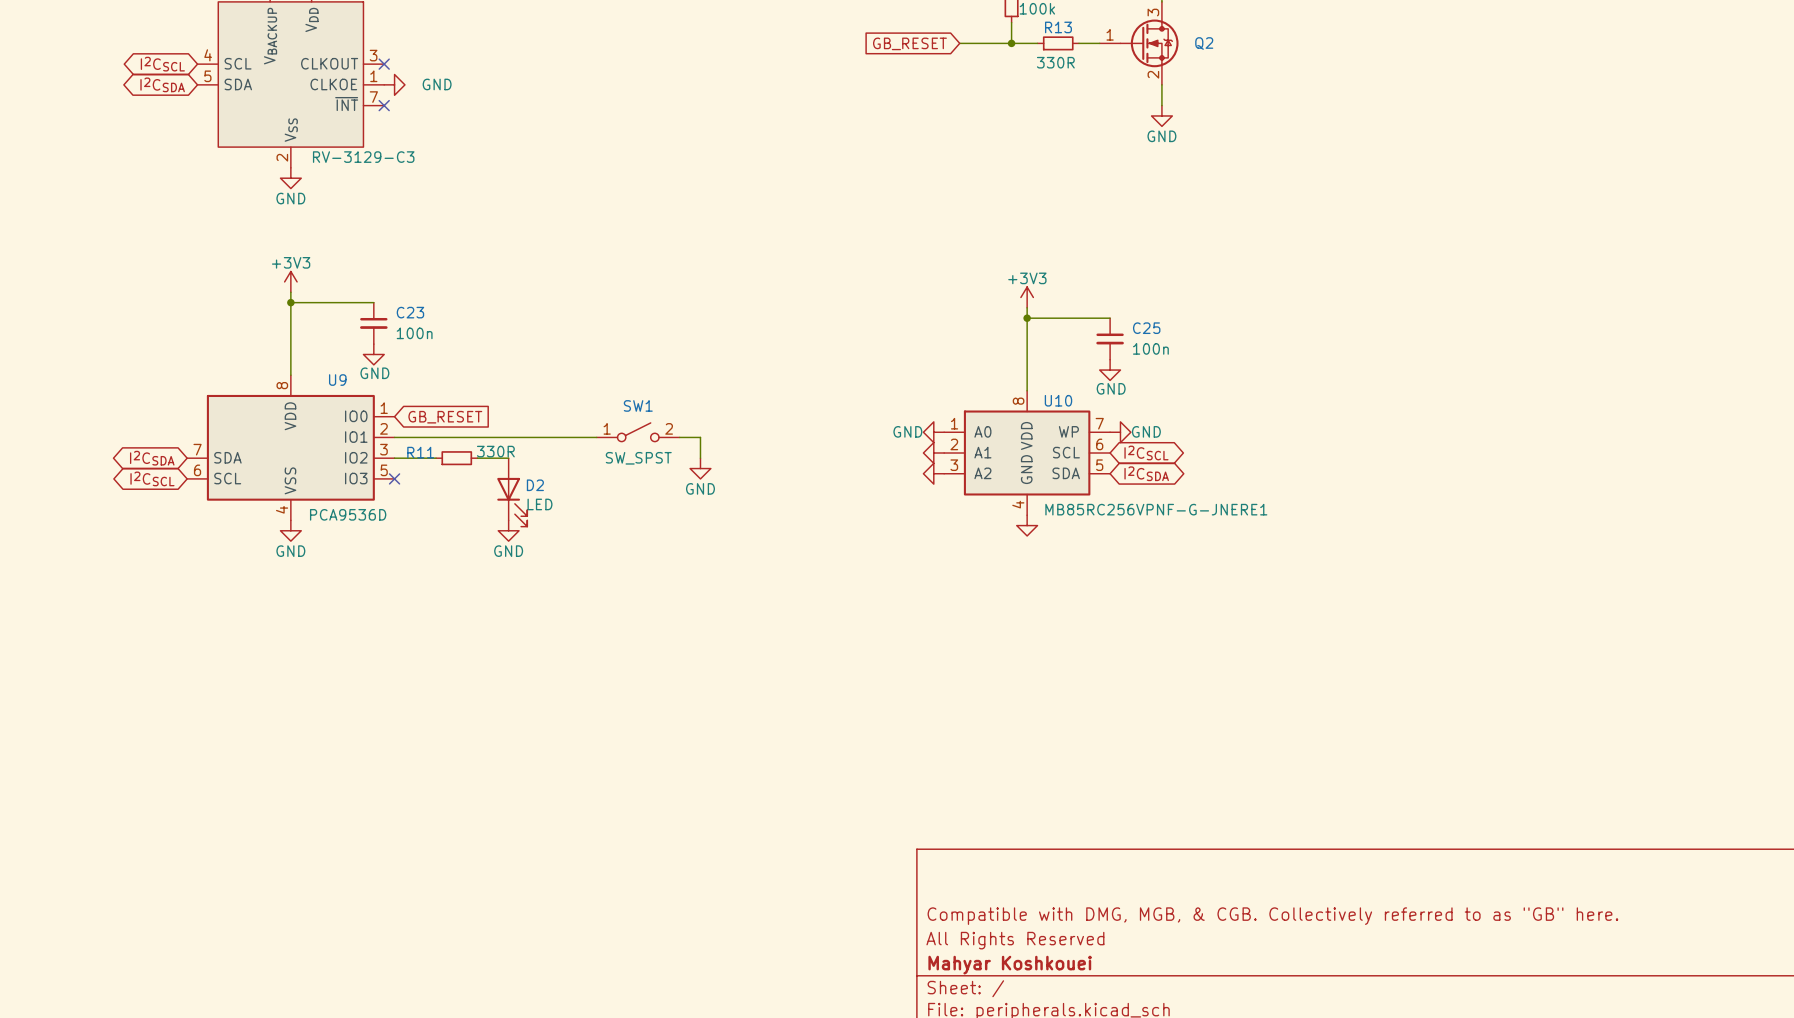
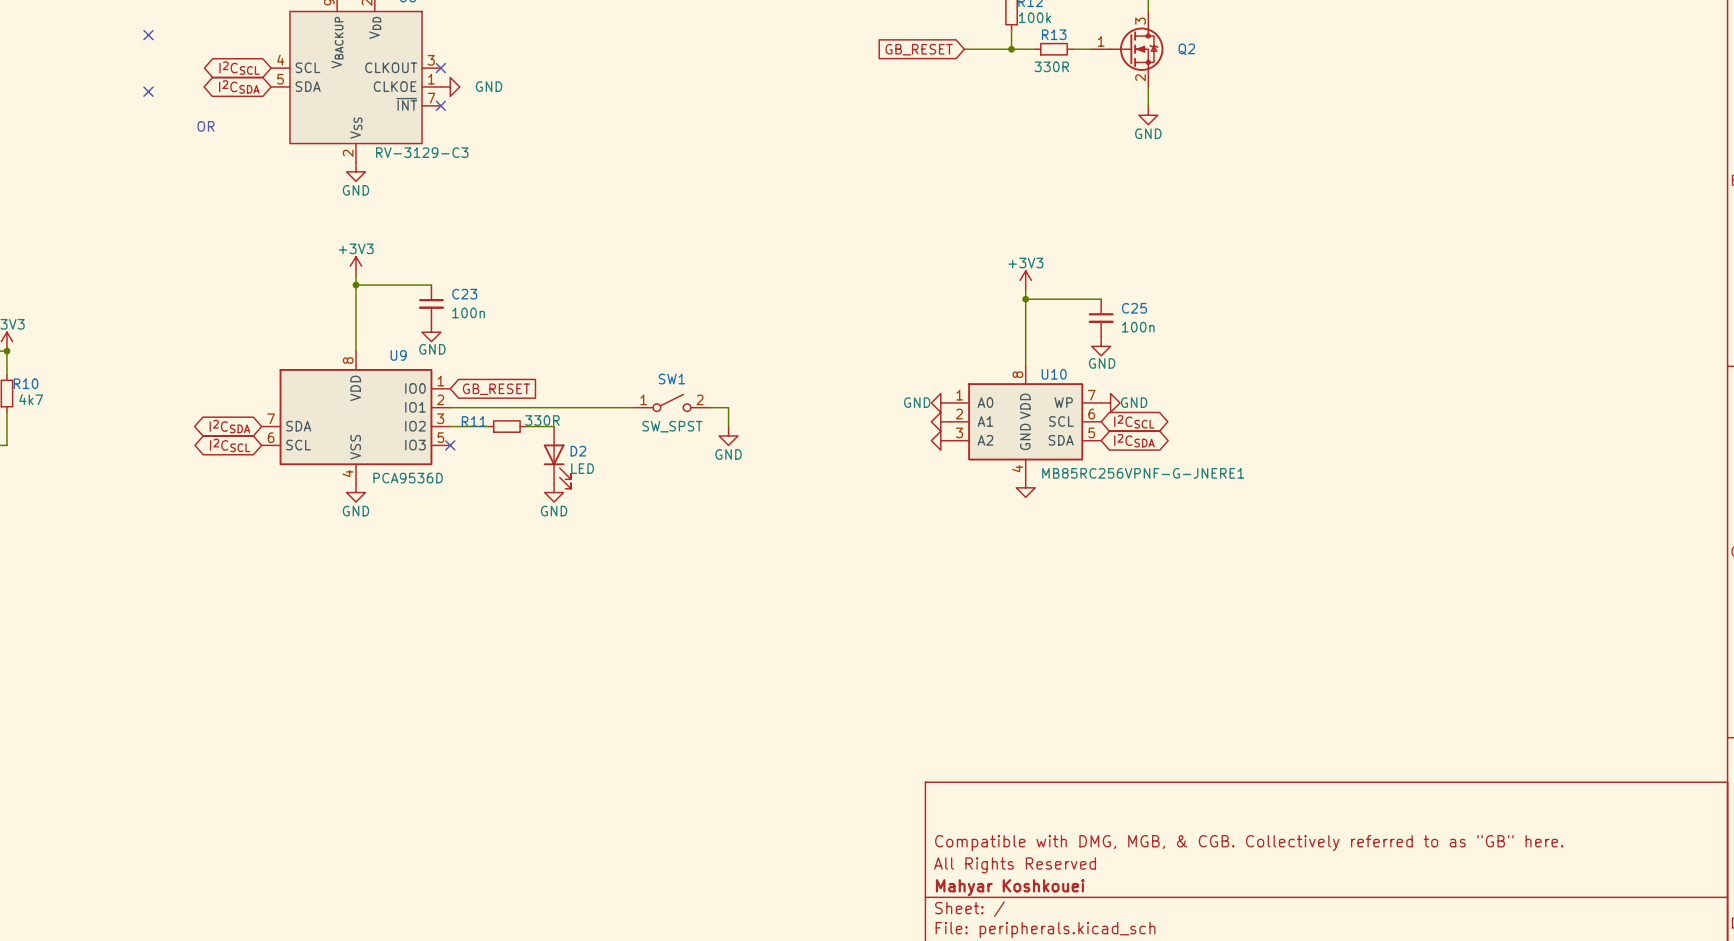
no-connect mark: none -> (148, 35)
no-connect mark: none -> (148, 91)
text: none -> OR (206, 126)

